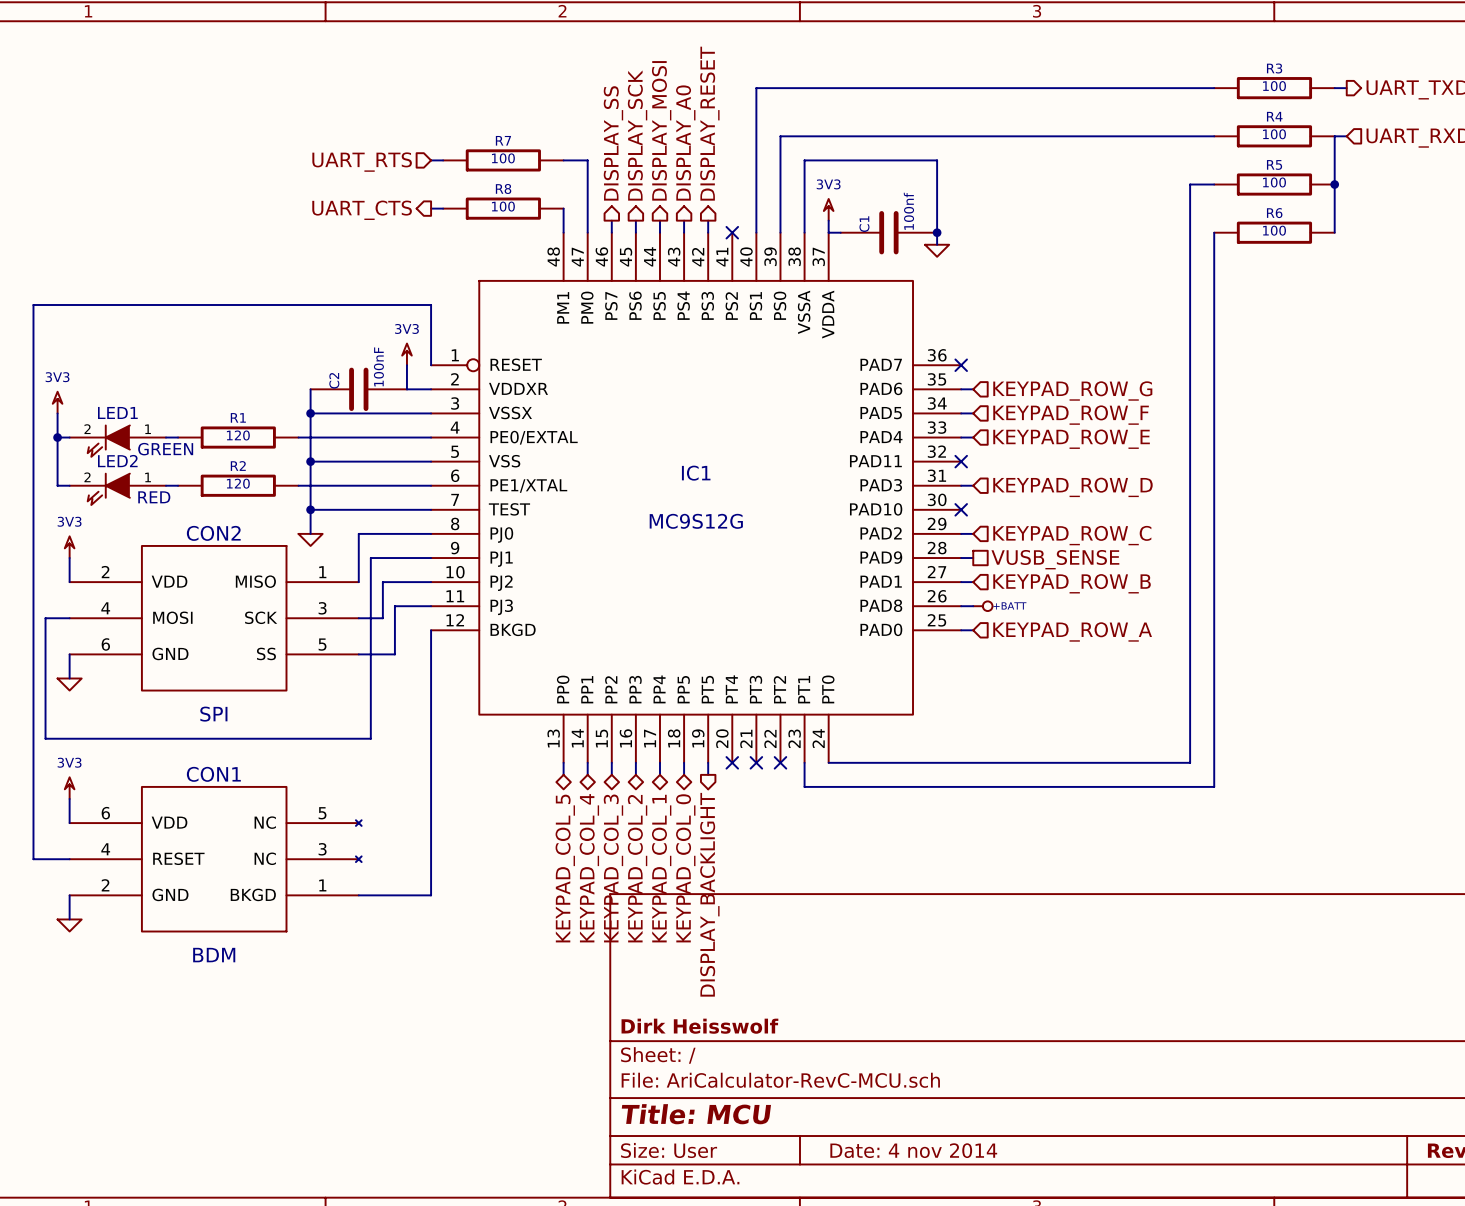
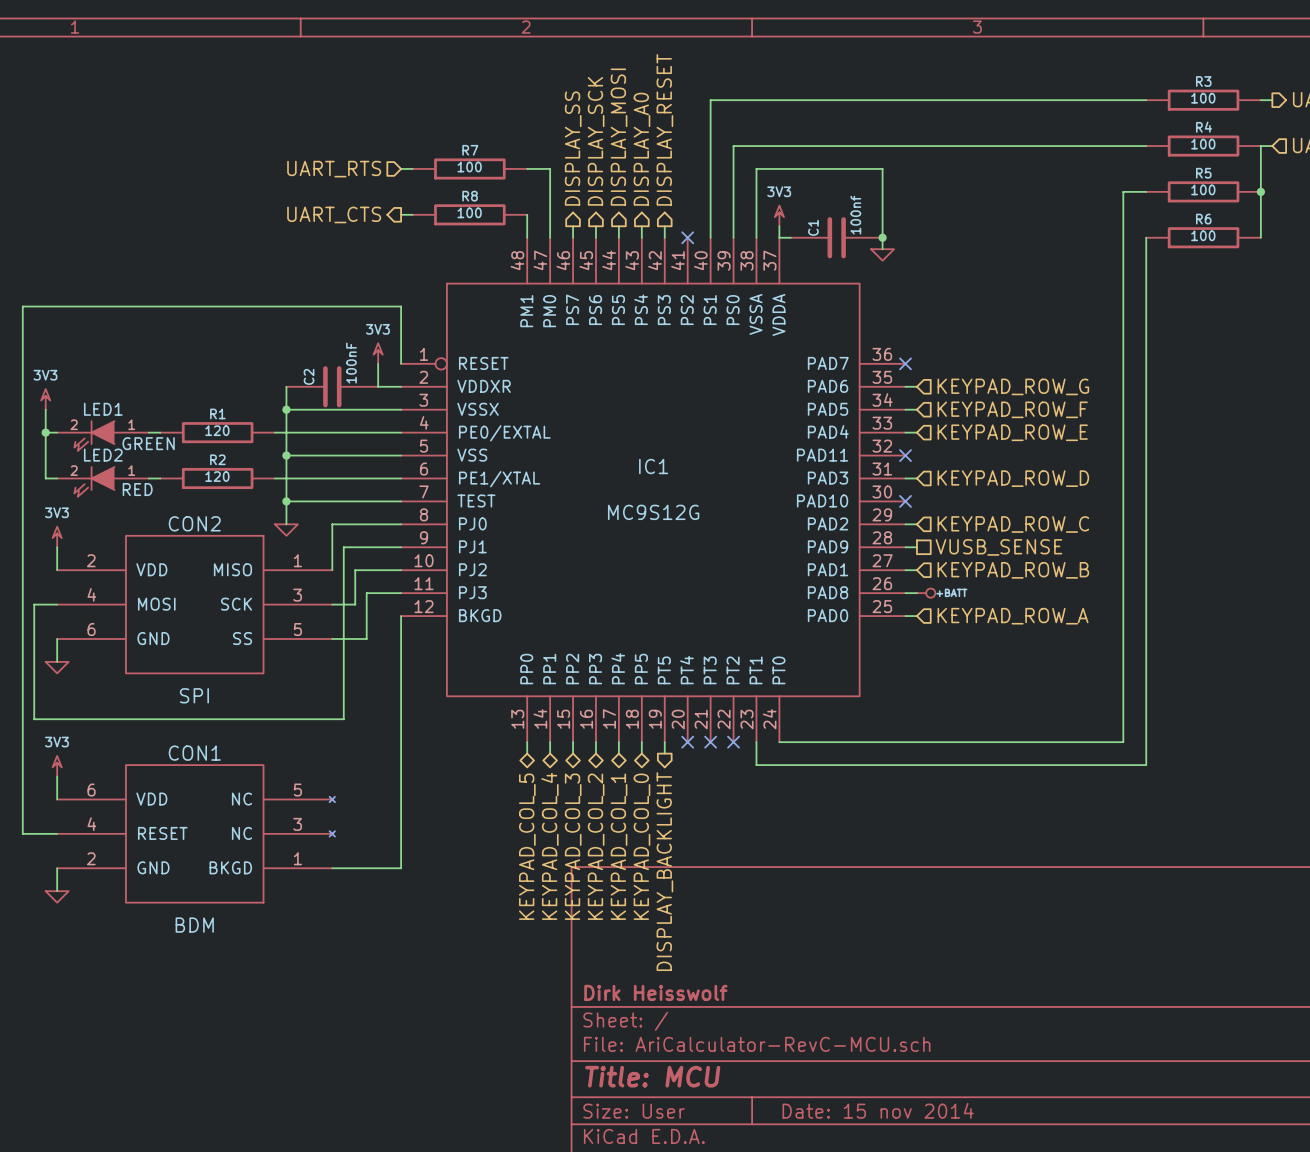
title block: Date: 4 nov 2014 (913, 1150) -> Date: 15 nov 2014 (878, 1110)

